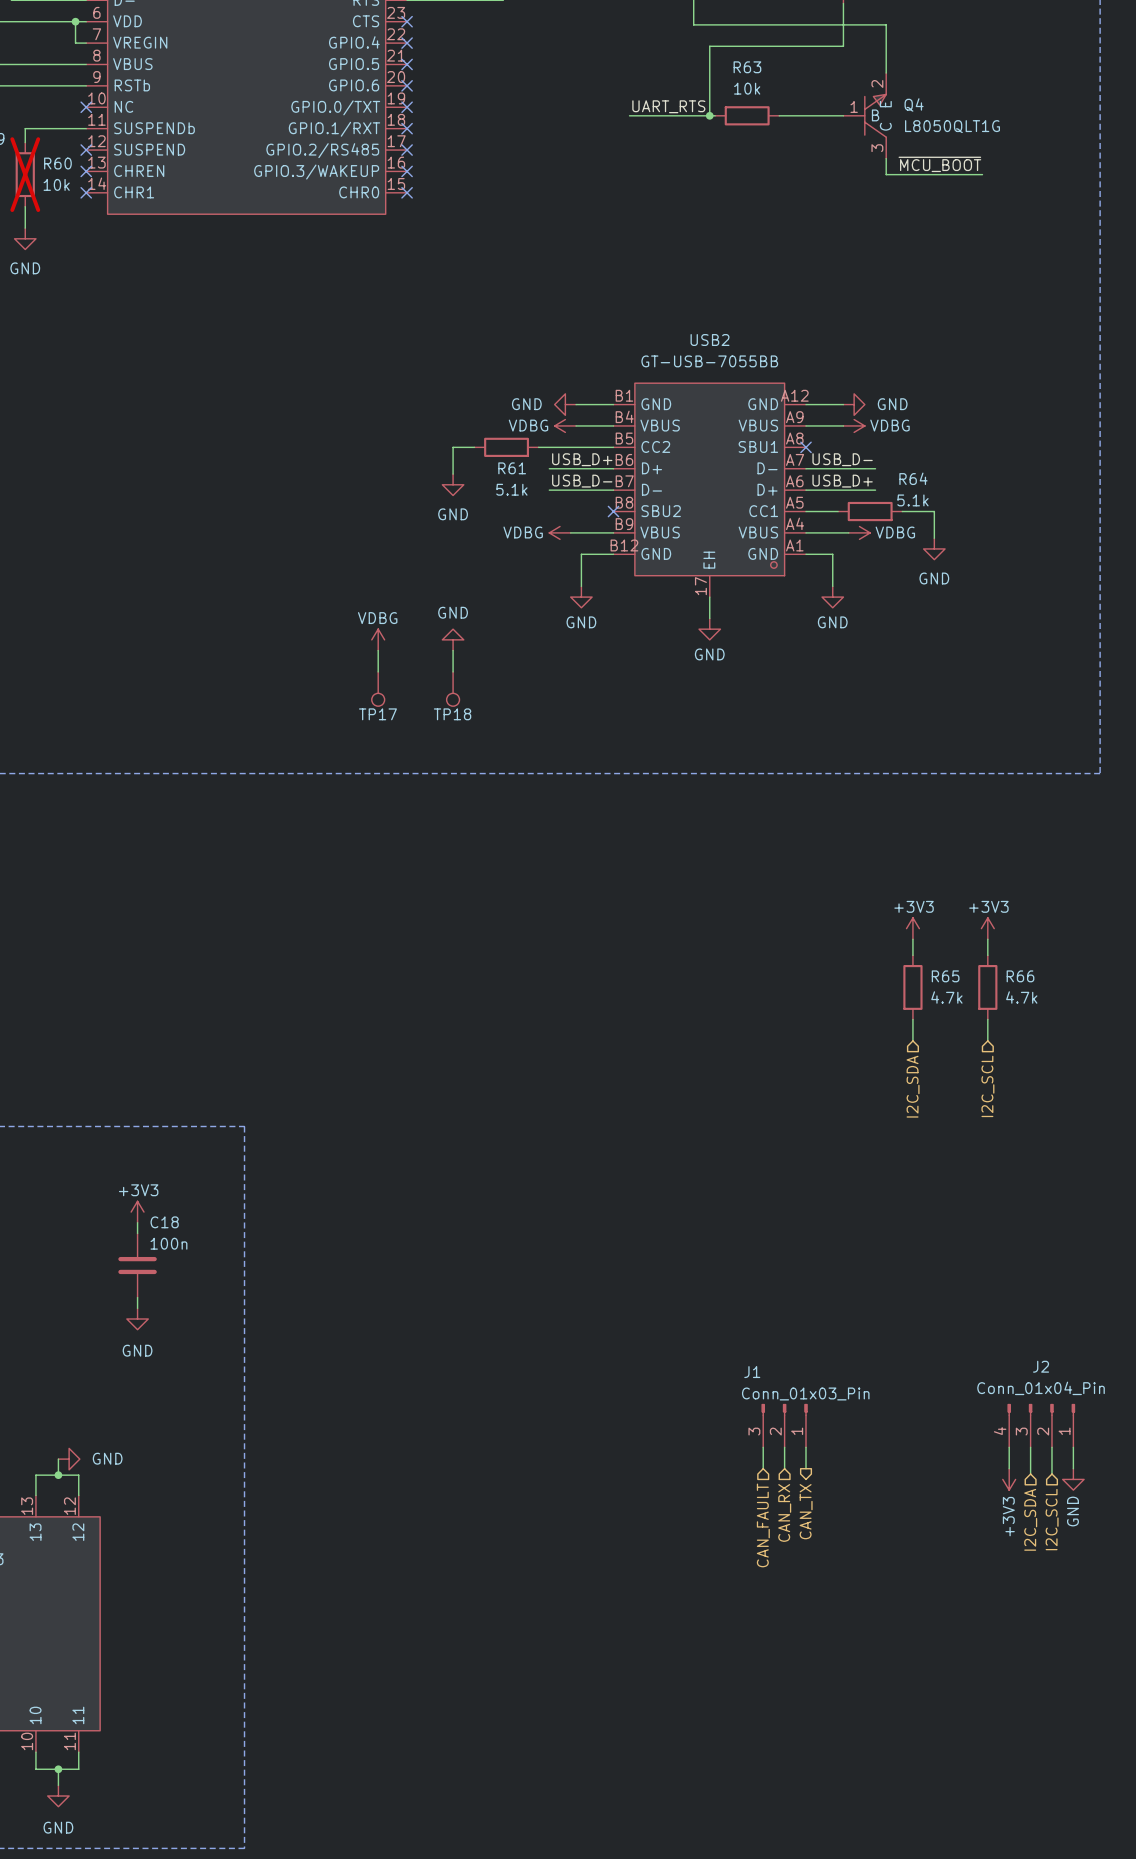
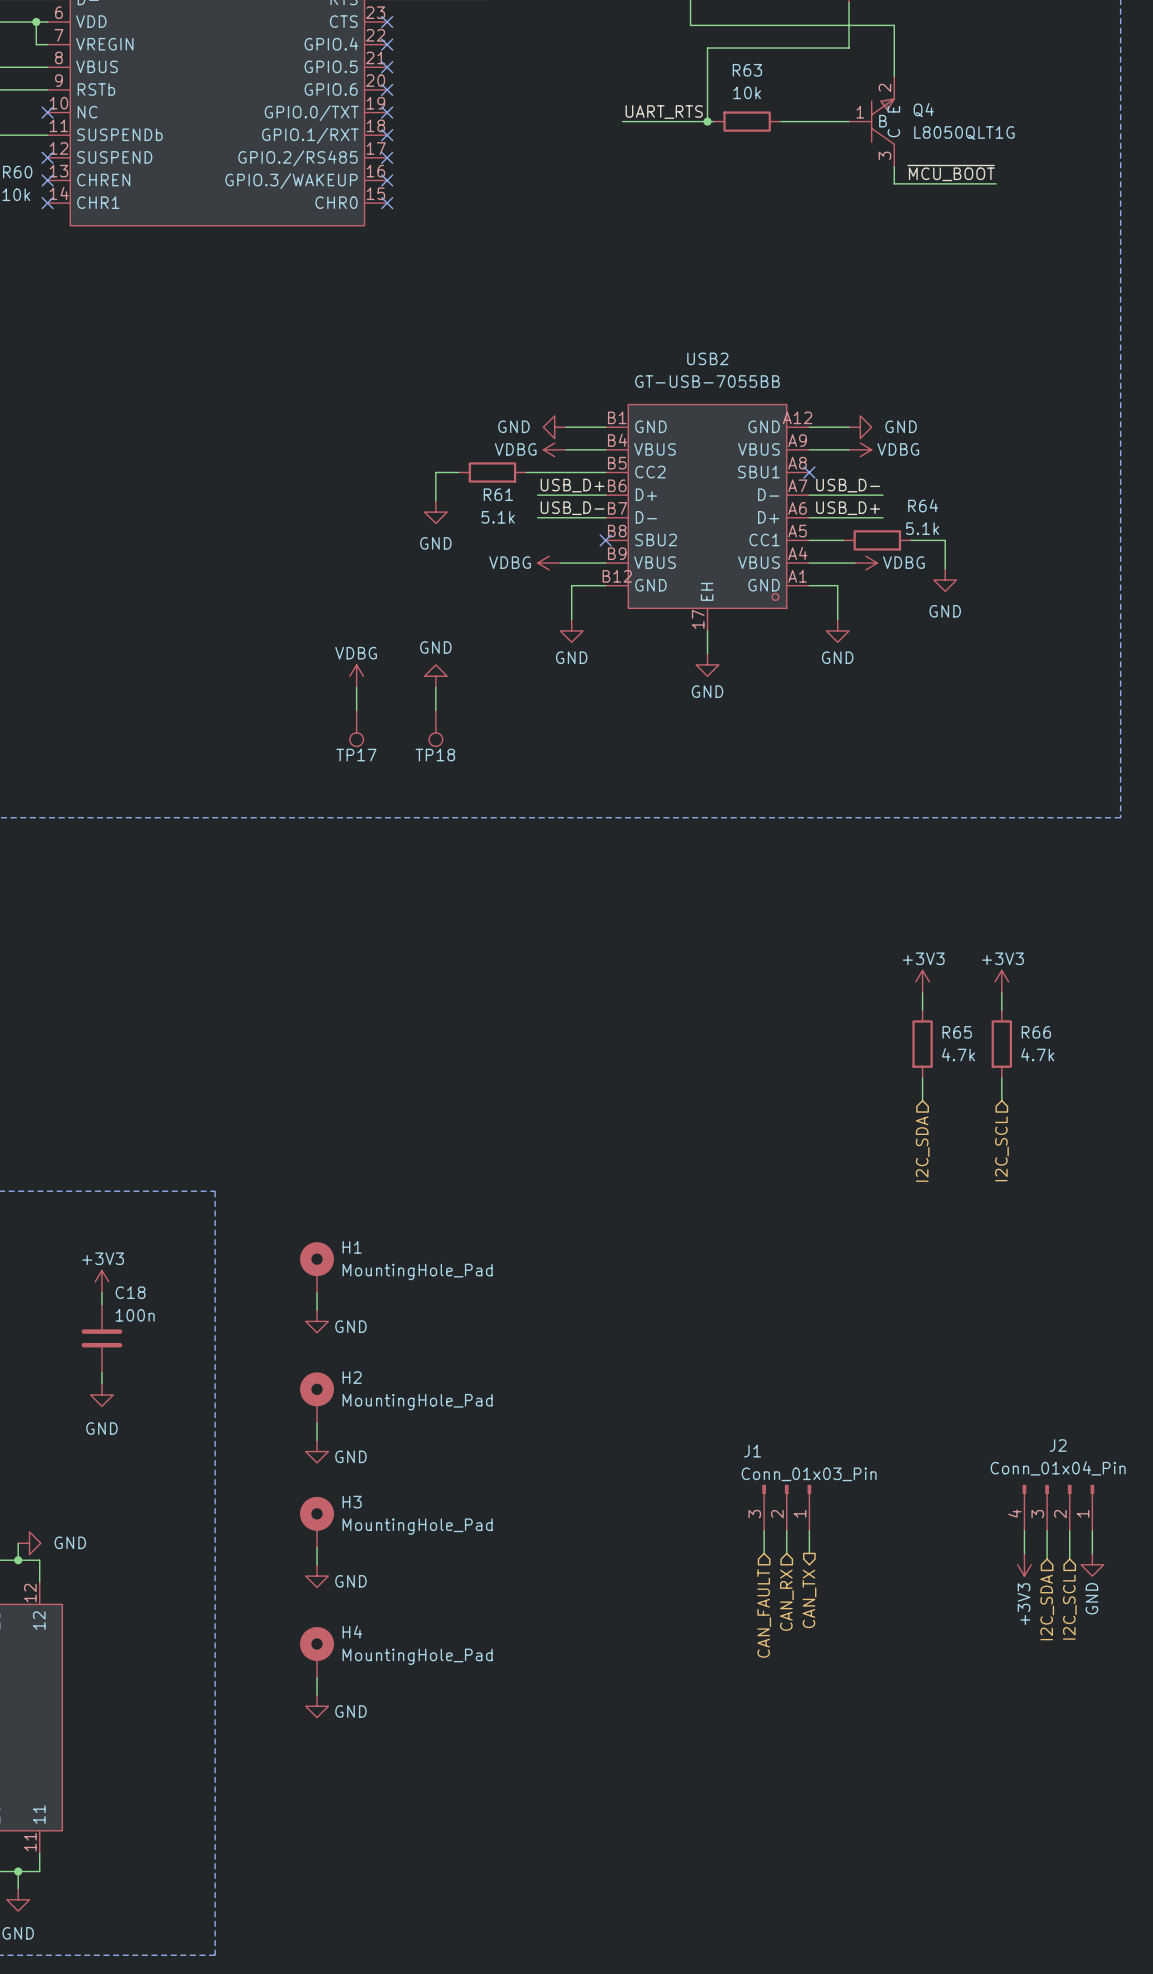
H1: none -> MountingHole_Pad (317, 1267)
wire: none -> (317, 1293) (317, 1310)
power symbol: none -> GND (317, 1321)
H2: none -> MountingHole_Pad (317, 1397)
wire: none -> (317, 1423) (317, 1440)
power symbol: none -> GND (317, 1451)
H3: none -> MountingHole_Pad (317, 1522)
wire: none -> (317, 1547) (317, 1564)
power symbol: none -> GND (317, 1576)
H4: none -> MountingHole_Pad (317, 1652)
wire: none -> (317, 1677) (317, 1694)
power symbol: none -> GND (317, 1706)

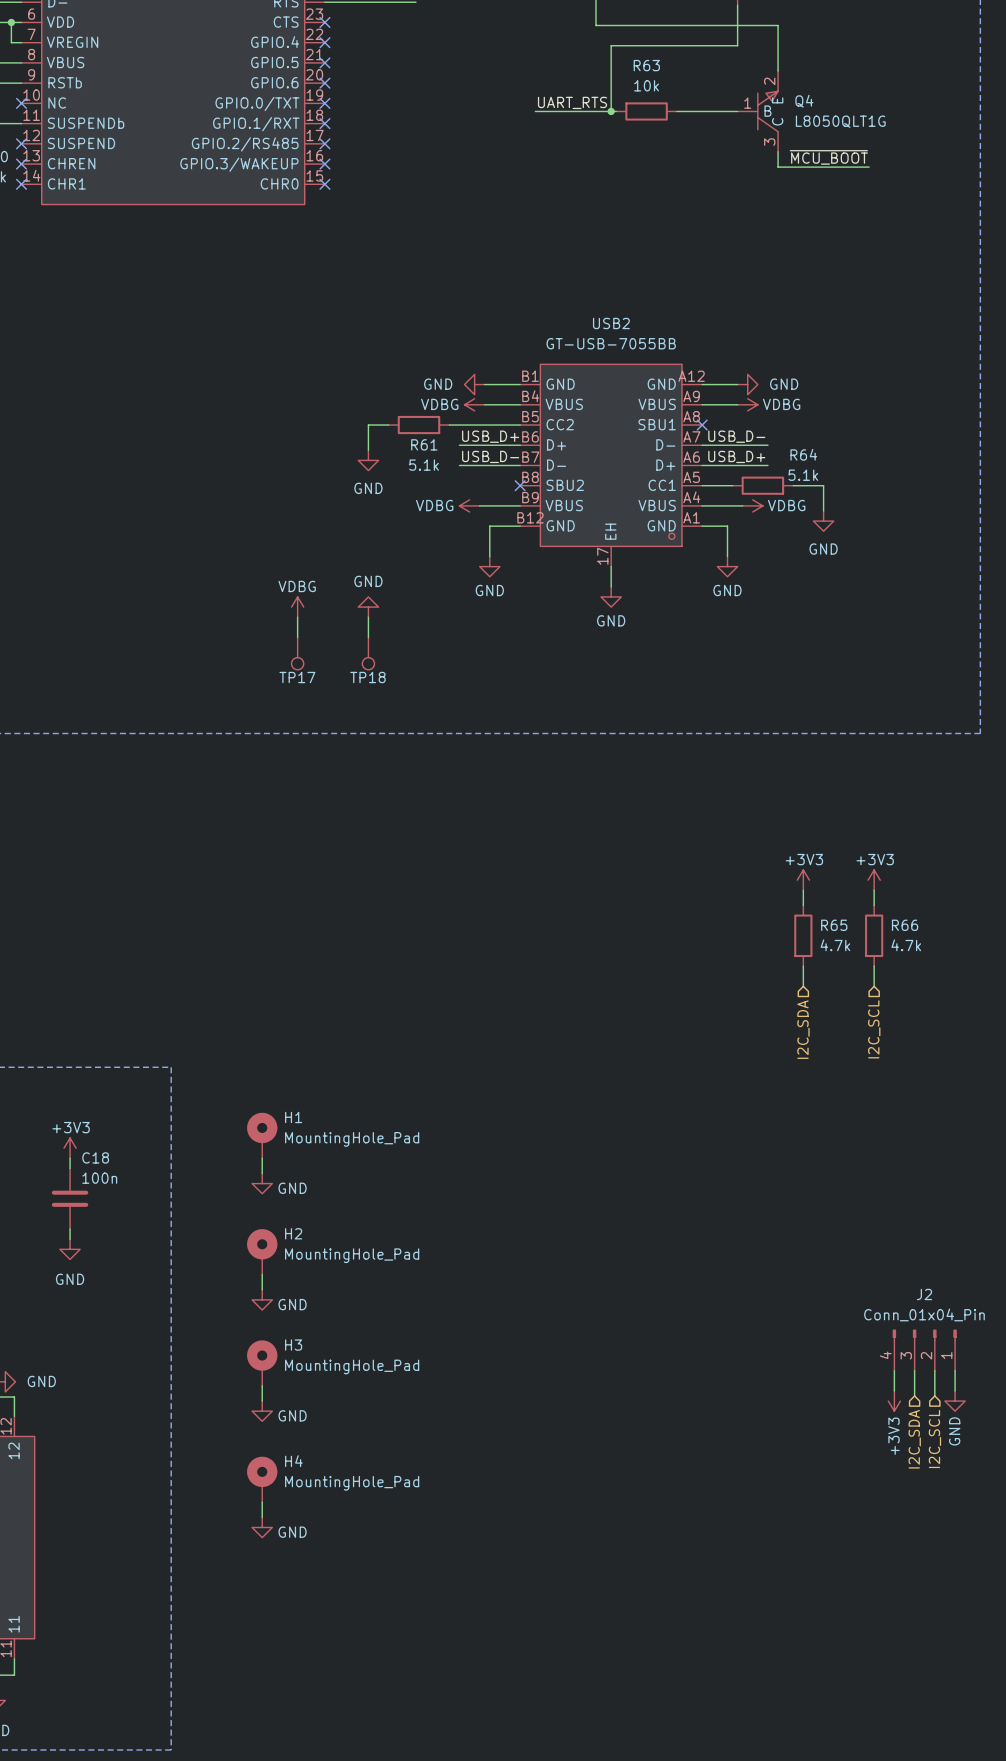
J1: Conn_01x03_Pin (786, 1507) -> none
wire: (764, 1530) (764, 1553) -> none
wire: (786, 1530) (786, 1553) -> none
wire: (809, 1530) (809, 1553) -> none
hierarchical label: CAN_TX (809, 1598) -> none
hierarchical label: CAN_RX (786, 1600) -> none
hierarchical label: CAN_FAULT (764, 1613) -> none

